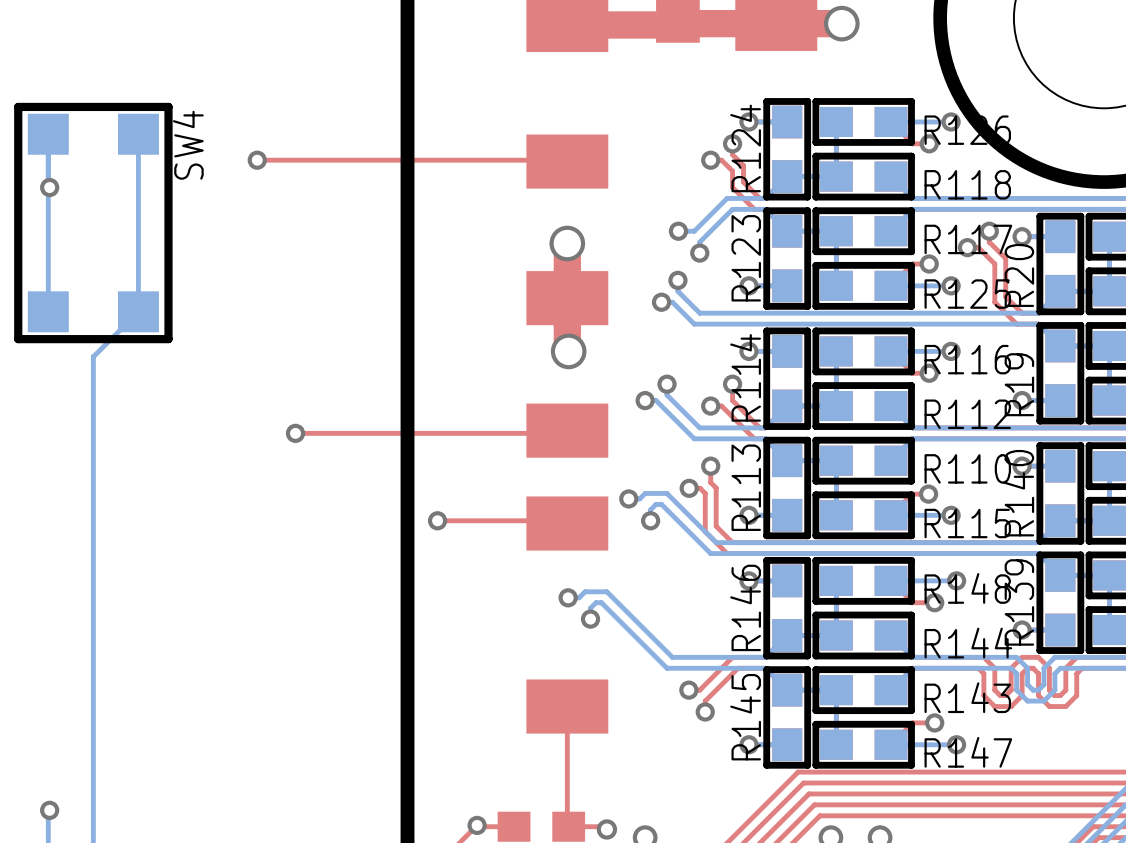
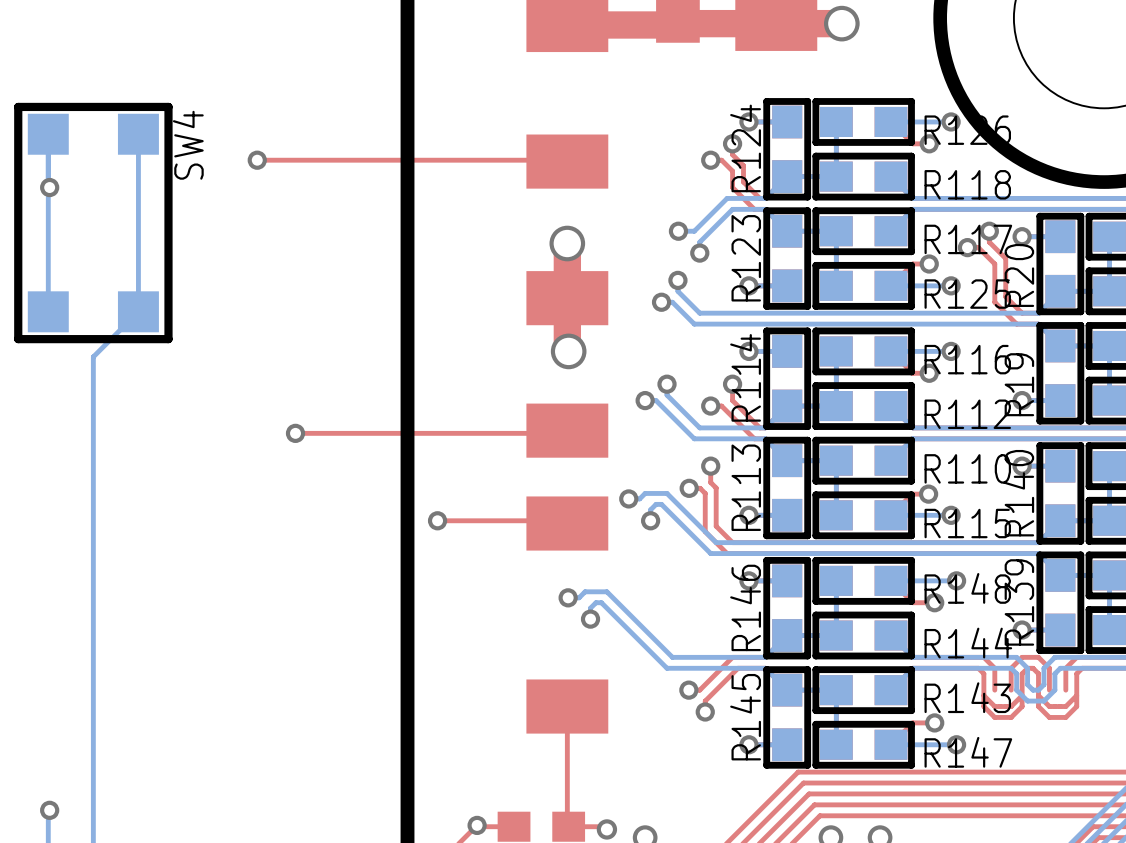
top track: (1011, 690) (1005, 695) (1000, 695) (994, 690) -> none
top track: (1065, 690) (1060, 695) (1054, 695) (1049, 690) -> none
top track: none -> (1022, 695) (1022, 706) (1011, 717) (994, 717) (983, 706) (983, 695)
top track: none -> (1076, 695) (1076, 706) (1065, 717) (1049, 717) (1038, 706) (1038, 695)

